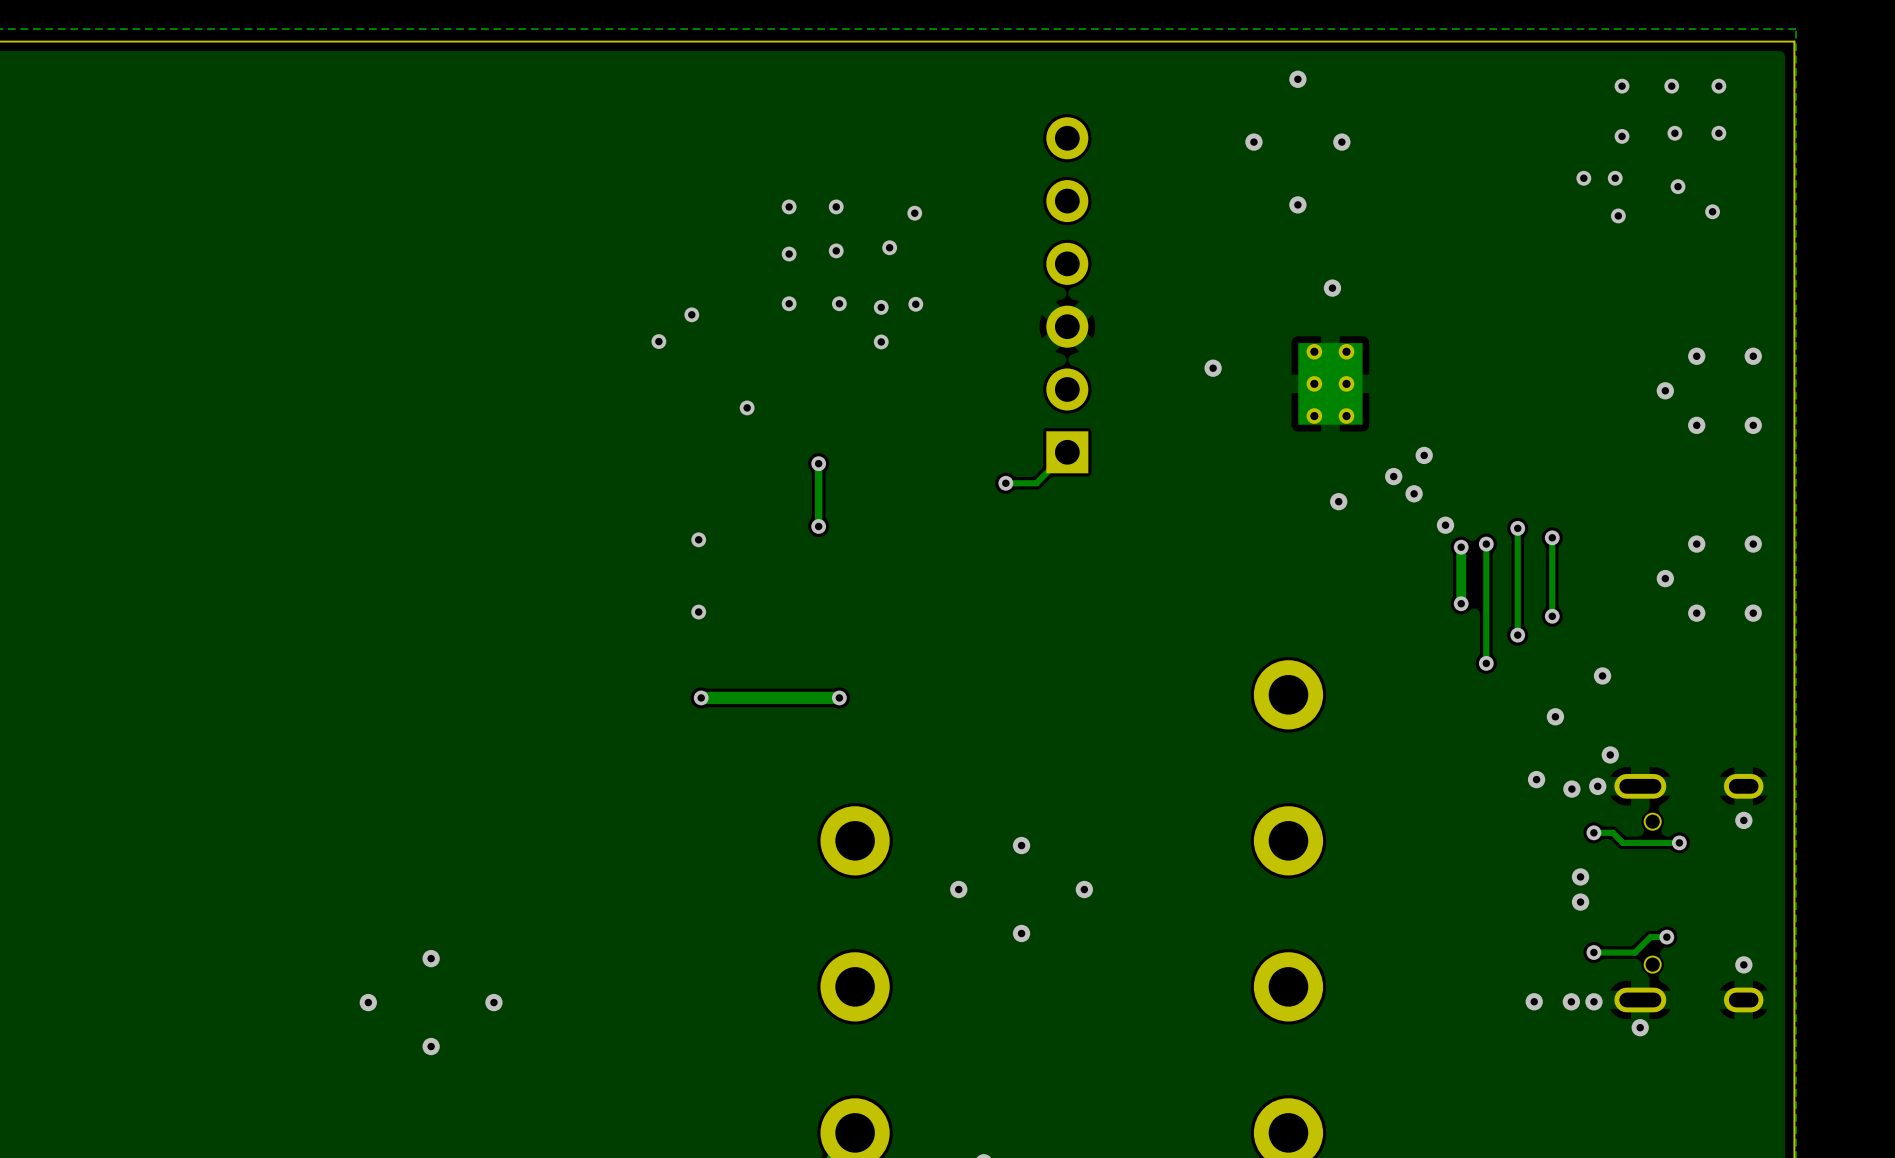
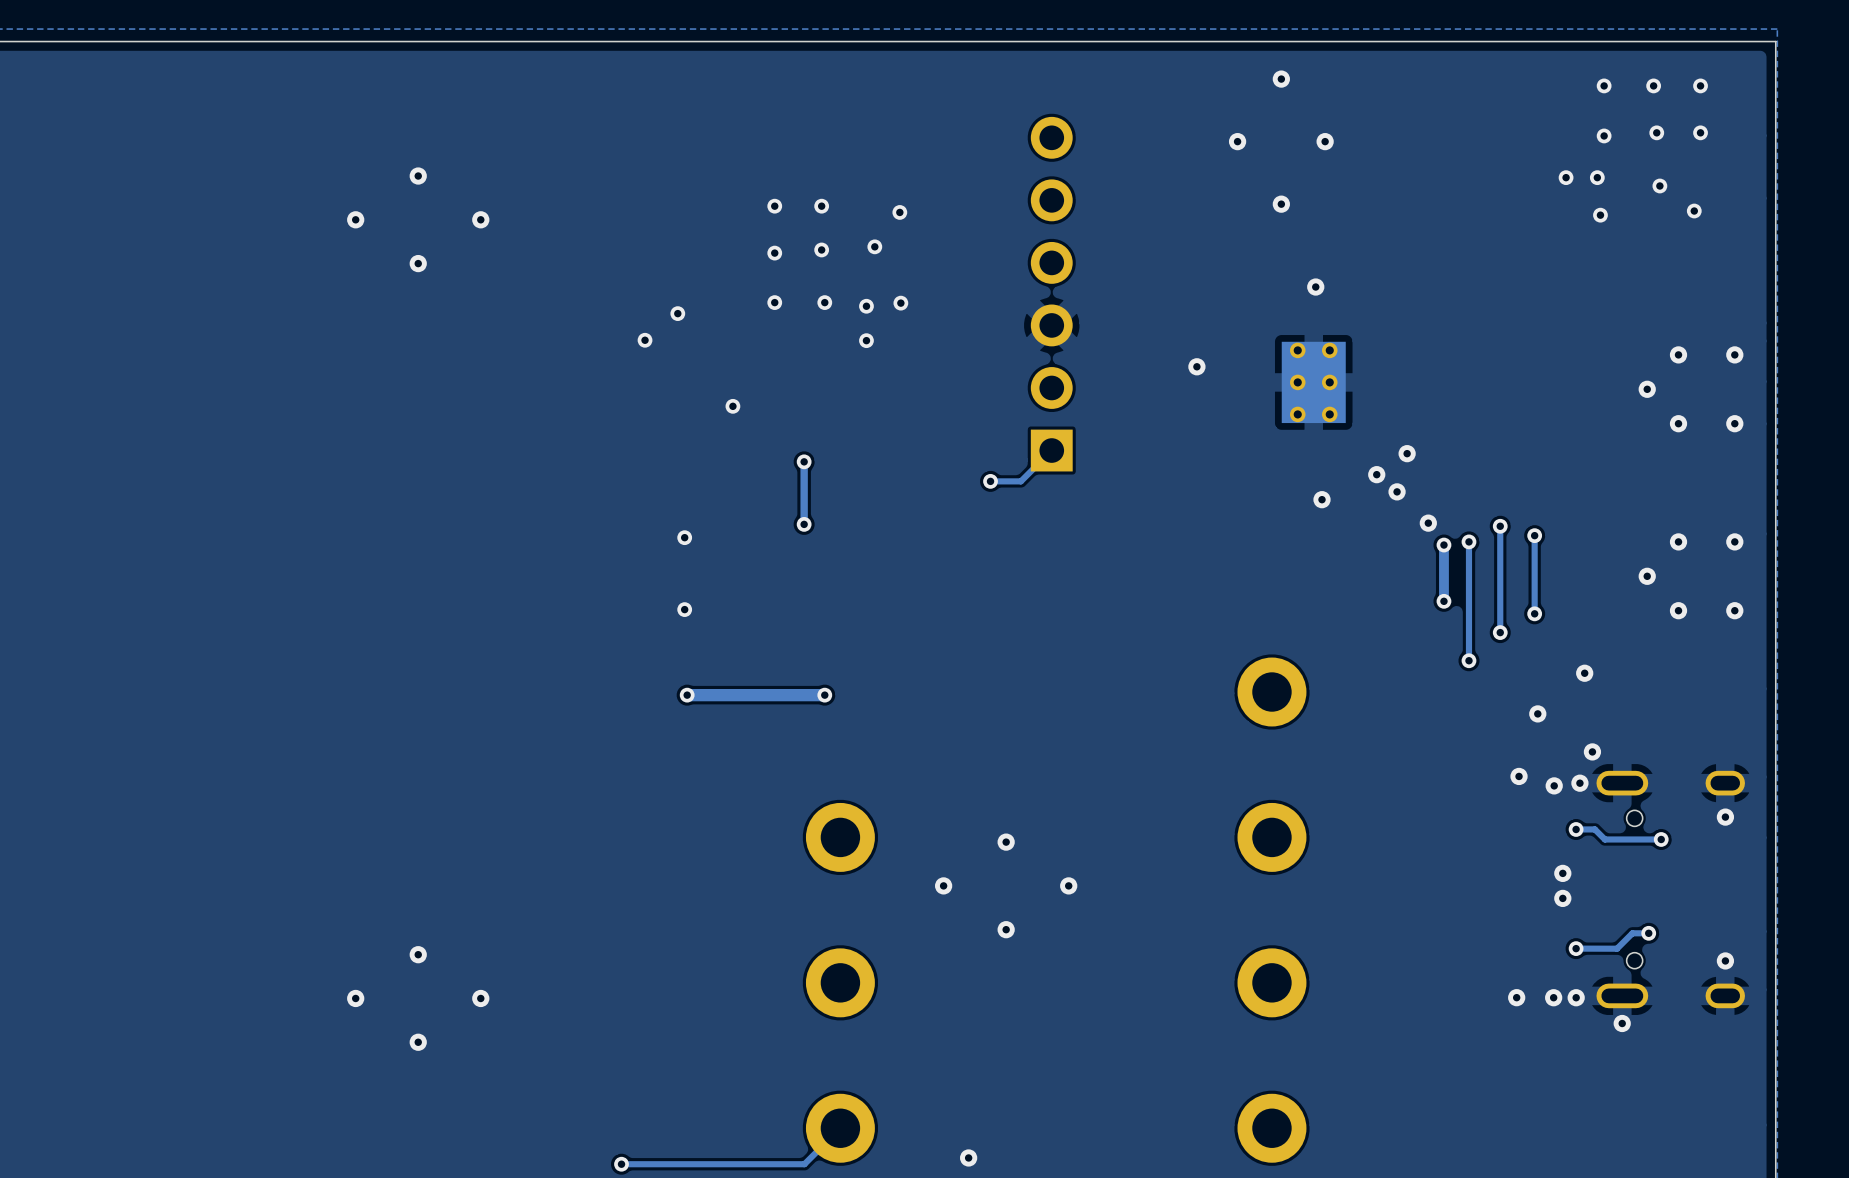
via: none -> (418, 176)
via: none -> (355, 219)
via: none -> (480, 219)
via: none -> (418, 263)

